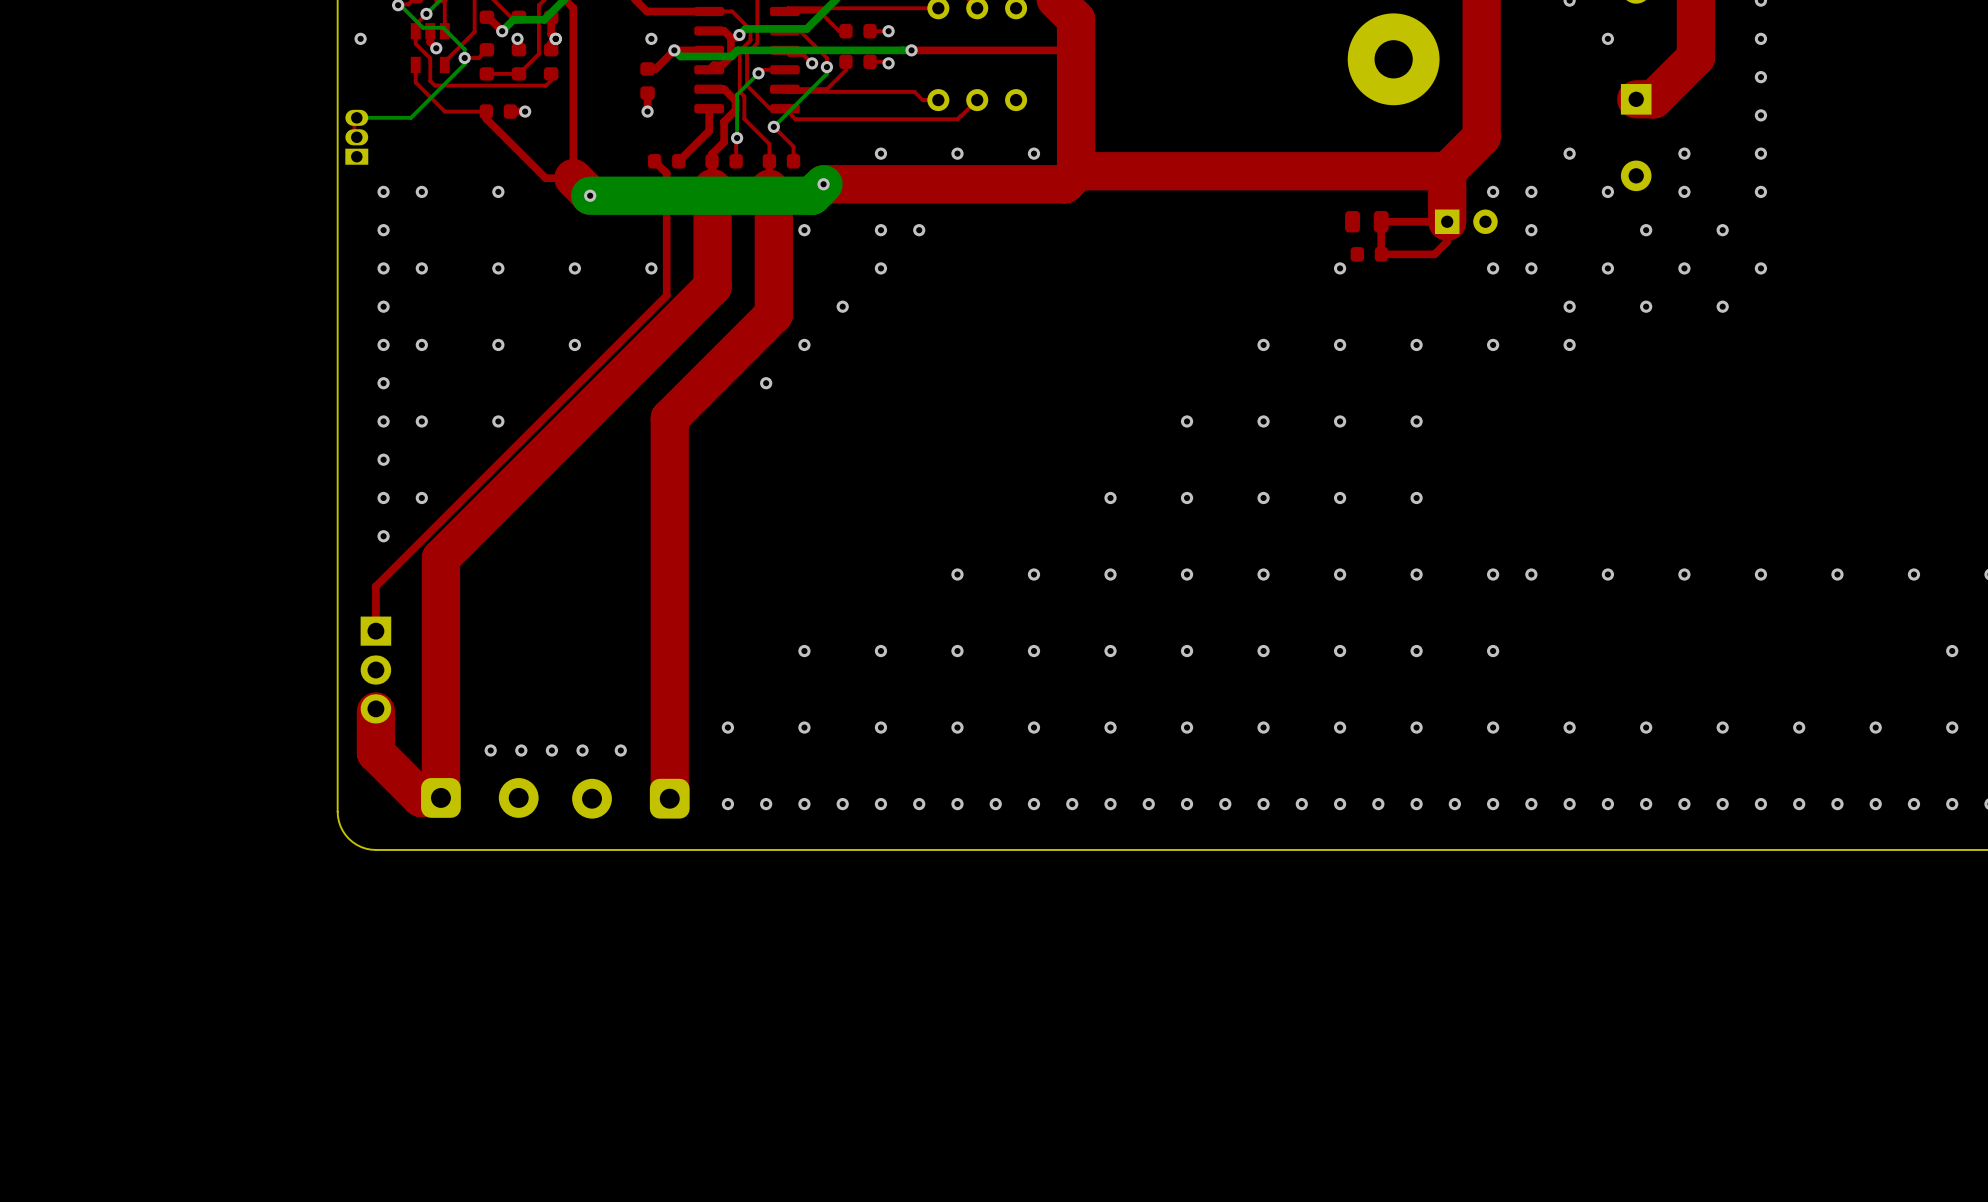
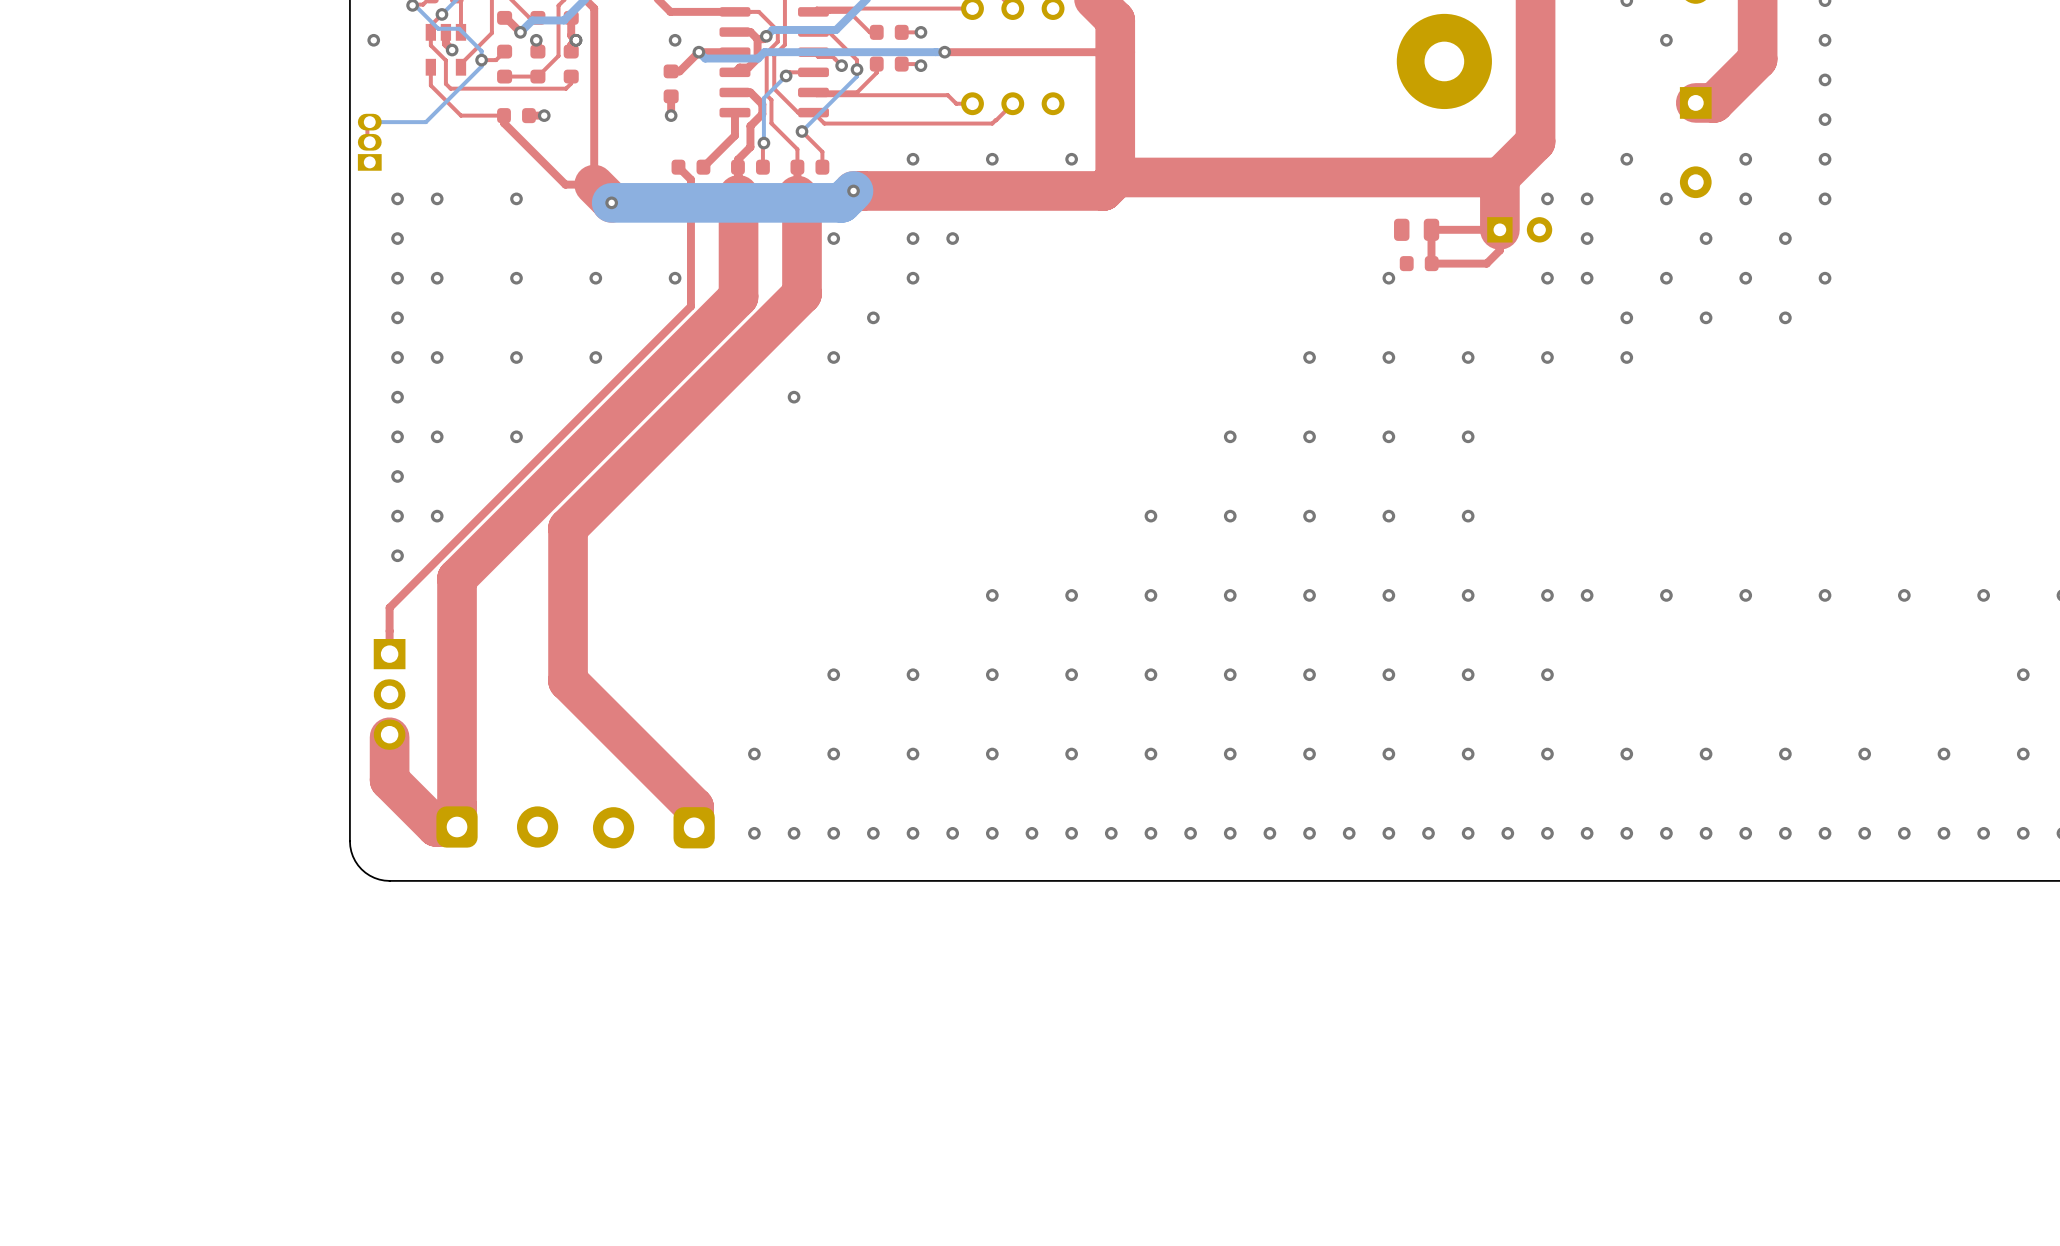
top track: (773, 283) (773, 314) (669, 418) (669, 778) -> (801, 294) (568, 528) (568, 681) (694, 807)
via: (490, 750) -> none
via: (521, 750) -> none
via: (551, 750) -> none
via: (582, 750) -> none
via: (620, 750) -> none

